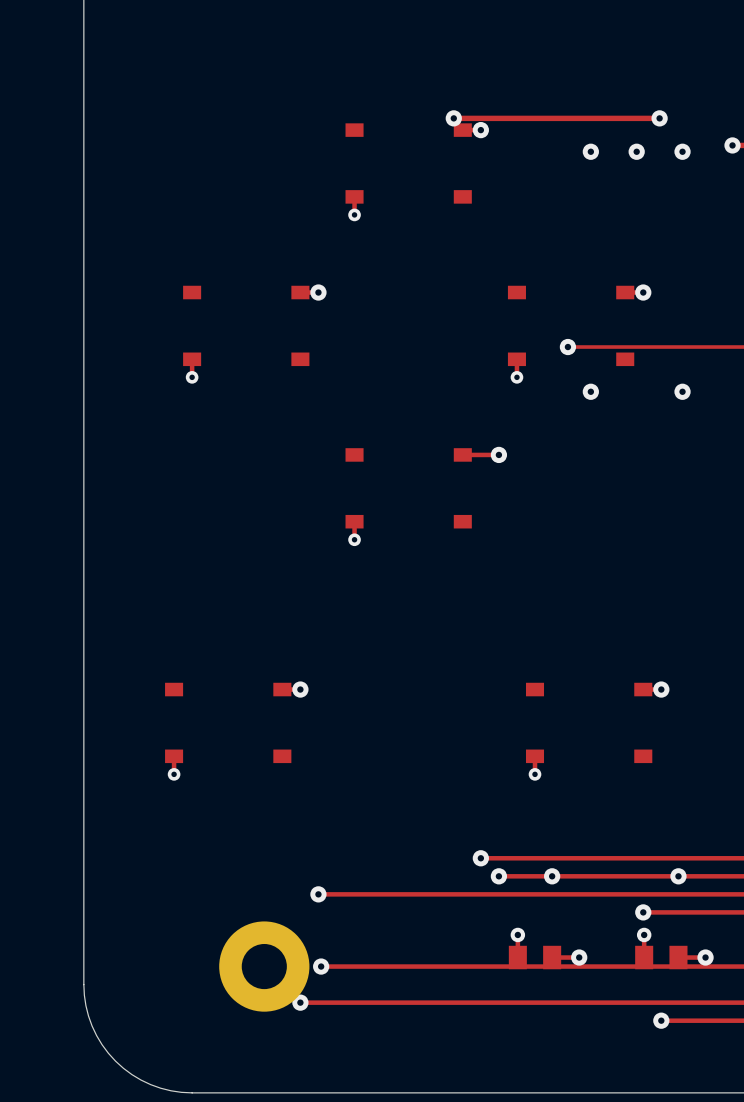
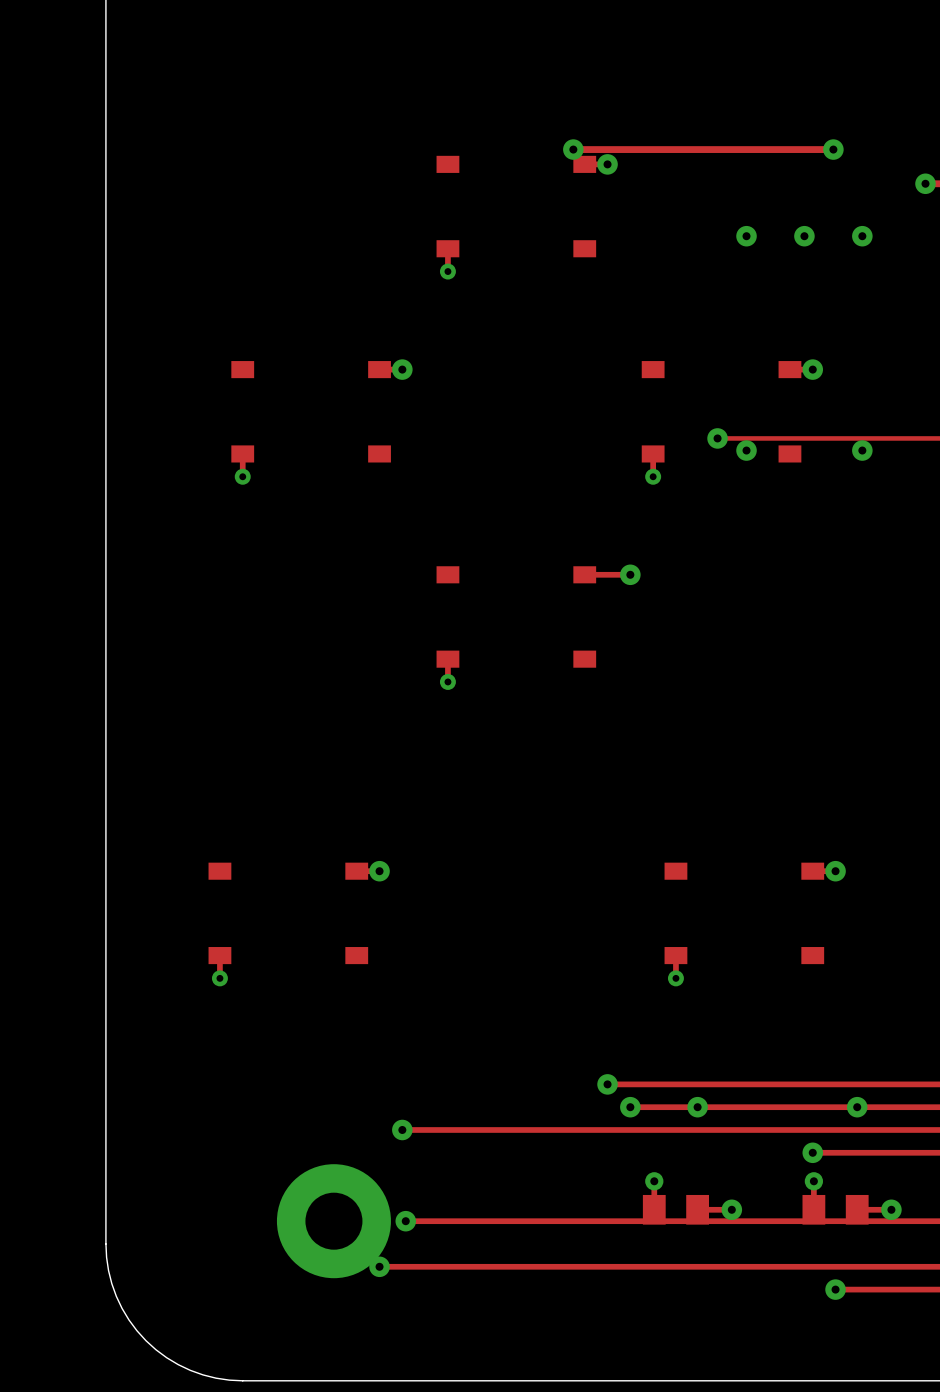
via: (590, 151) -> none
via: (636, 151) -> none
via: (682, 151) -> none
via: none -> (746, 236)
via: none -> (804, 236)
via: none -> (862, 236)
via position: (590, 391) -> (746, 450)
via position: (682, 391) -> (862, 450)

